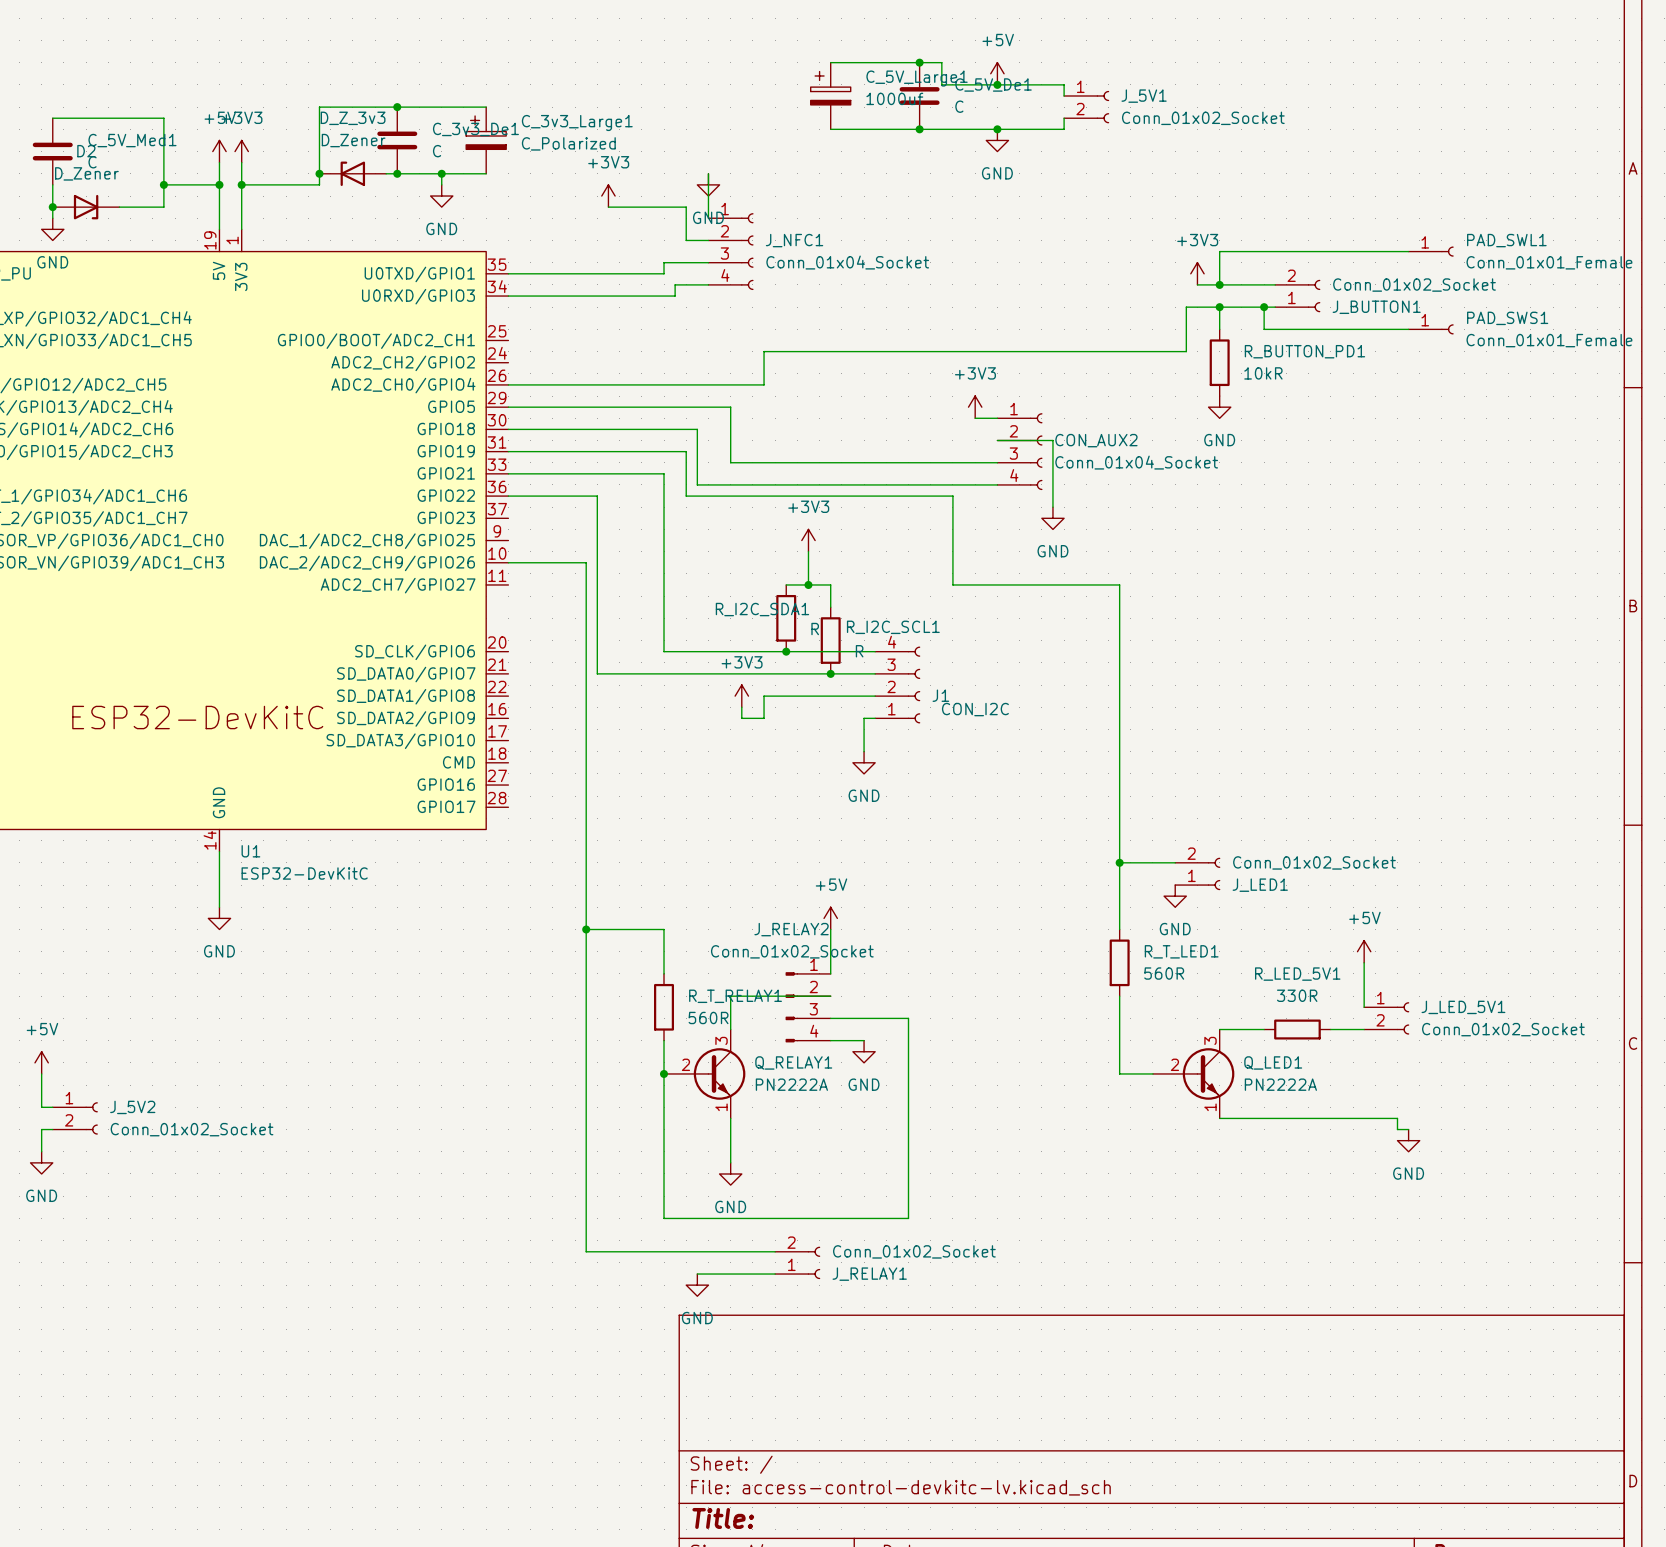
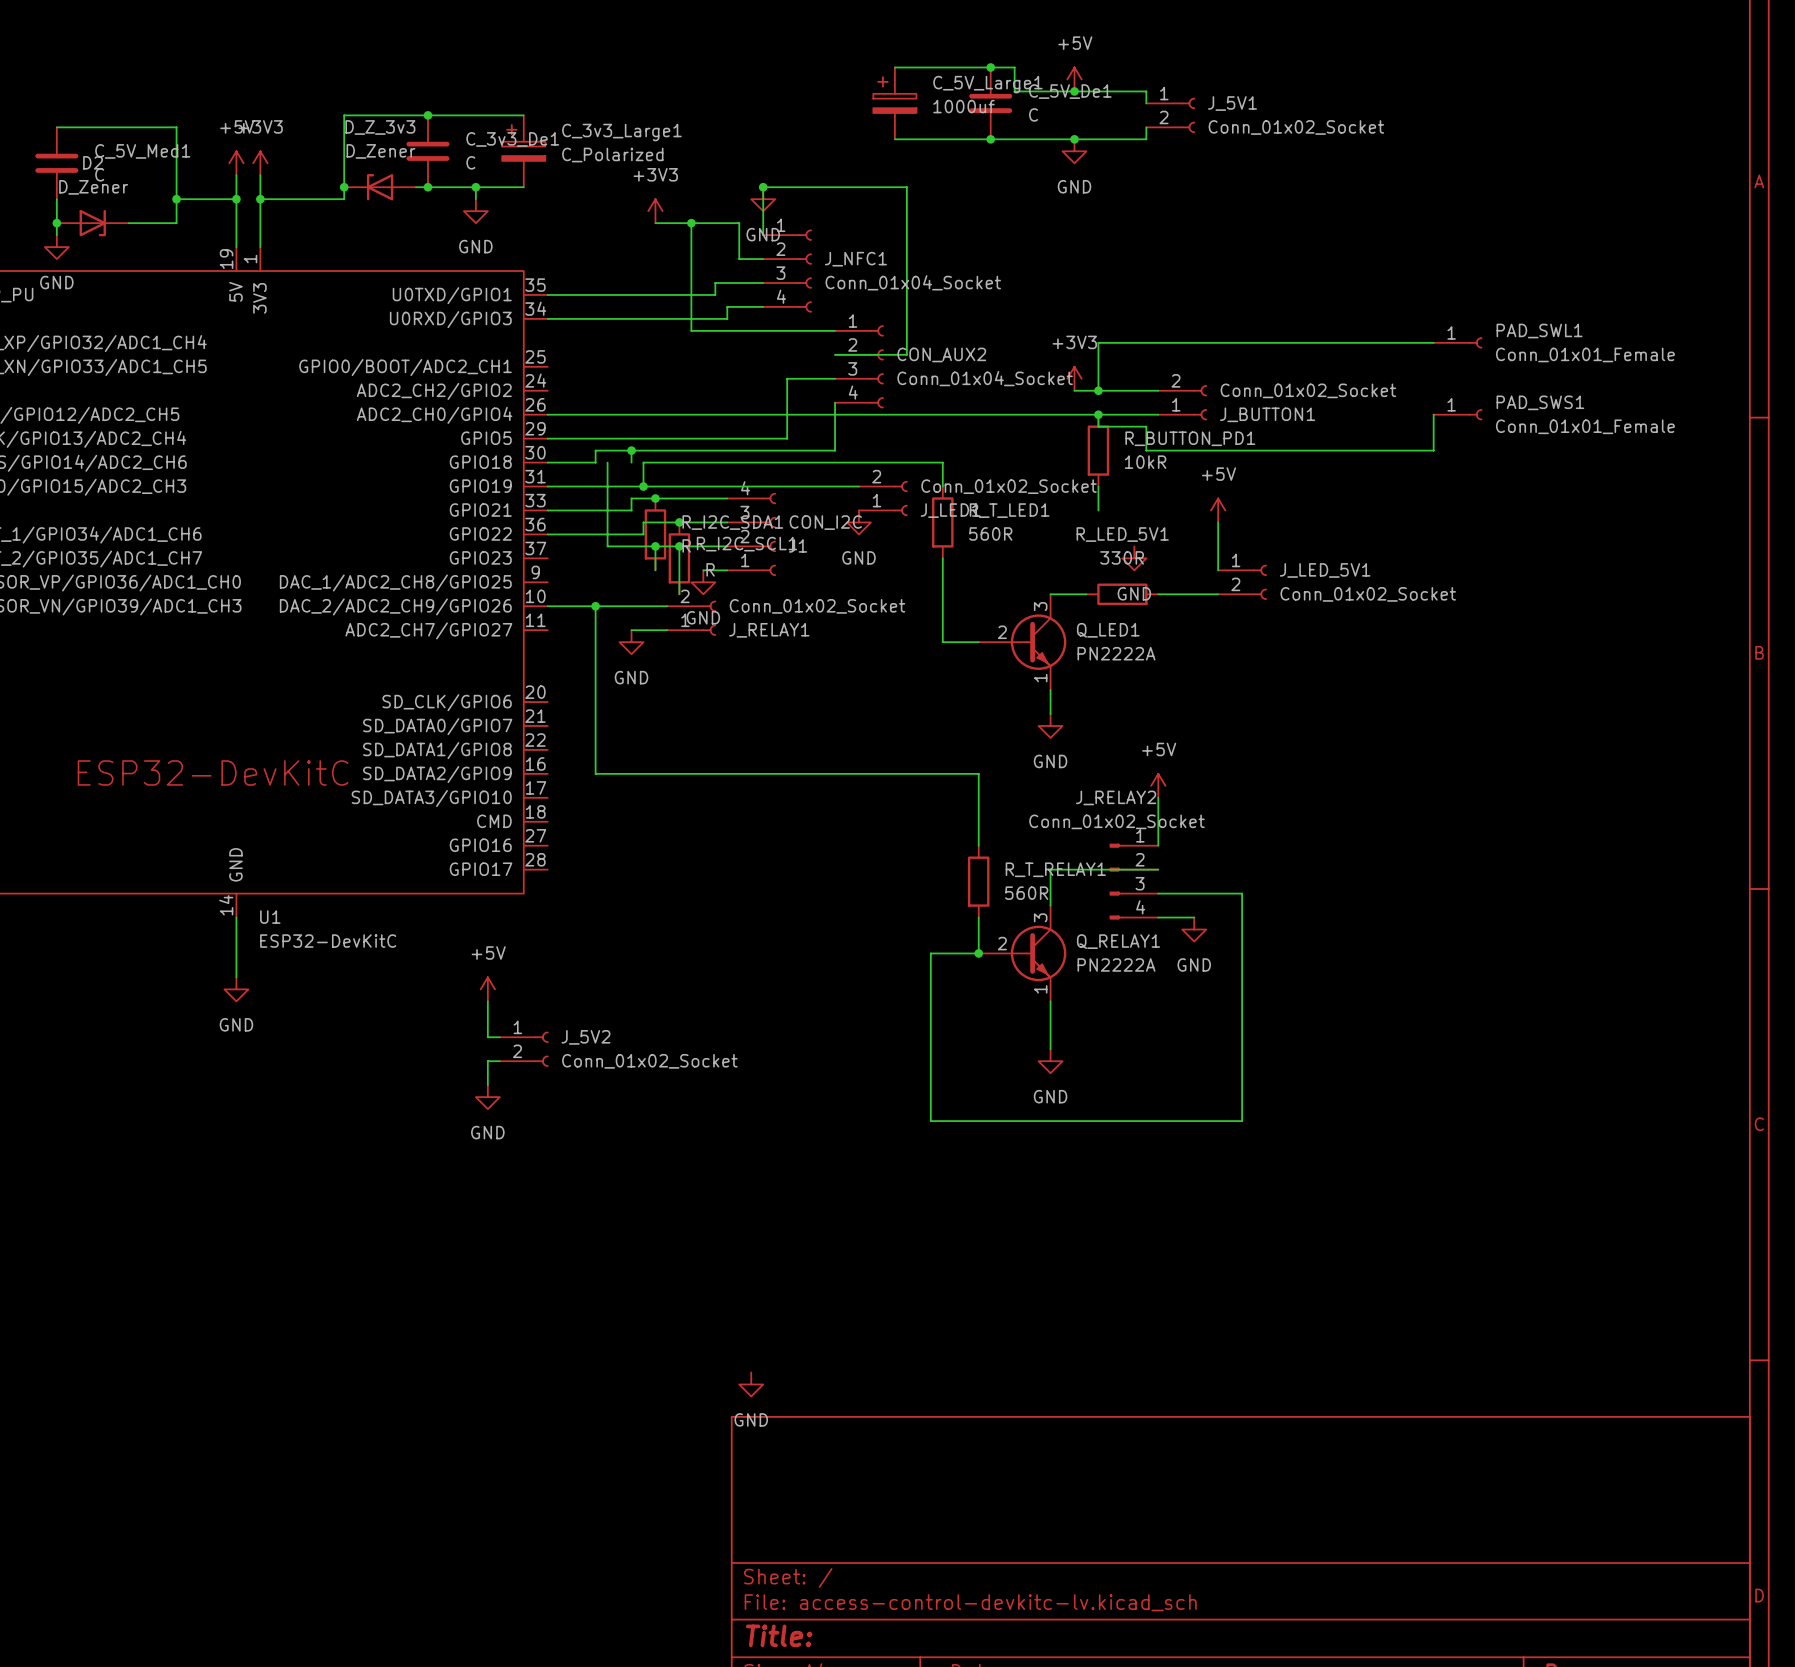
wire: none -> (763, 187) (906, 187) (906, 354) (835, 354)
junction: none -> (763, 187)
wire: none -> (691, 223) (691, 330) (835, 330)
junction: none -> (691, 223)
wire: (1408, 251) (1219, 251) (1219, 284) -> none
PAD_SWL1 position: (1431, 251) -> (1457, 342)
power symbol: +3V3 (1197, 273) -> none
wire: (1197, 284) (1275, 284) -> (1074, 390) (1158, 390)
junction: (1219, 284) -> none
J_BUTTON1 position: (1297, 296) -> (1182, 402)
wire: (1219, 307) (1219, 329) -> none
junction: (1219, 307) -> none
wire: (1264, 307) (1264, 329) (1408, 329) -> none
junction: (1264, 307) -> none
wire: (1275, 307) (1186, 307) (1186, 351) (775, 351) -> none
wire: none -> (1433, 342) (1098, 342) (1098, 390)
PAD_SWS1 position: (1431, 329) -> (1457, 414)
wire: (764, 351) (764, 384) -> (823, 378) (787, 378) (787, 438)
junction: none -> (1098, 390)
R_BUTTON_PD1 position: (1219, 362) -> (1098, 450)
wire: none -> (835, 402) (835, 450) (595, 450) (595, 462)
wire: none -> (823, 414) (1158, 414)
wire: none -> (1098, 414) (1098, 426) (1146, 426) (1146, 450) (1433, 450) (1433, 414)
junction: none -> (1098, 414)
wire: (730, 407) (730, 462) (997, 462) -> none
power symbol position: +3V3 (975, 407) -> +3V3 (1074, 378)
power symbol: GND (1219, 407) -> none
wire: none -> (631, 450) (631, 462)
junction: none -> (631, 450)
wire: (975, 418) (997, 418) -> none
wire: (552, 429) (597, 429) -> (643, 486) (643, 462)
wire: none -> (607, 462) (607, 546) (727, 546)
wire: (697, 429) (697, 484) (997, 484) -> (751, 462) (942, 462) (942, 486)
wire: (997, 440) (1052, 440) (1052, 507) -> none
junction: none -> (643, 486)
wire: (686, 451) (686, 496) (952, 496) (952, 584) (1119, 584) (1119, 929) -> (739, 486) (858, 486)
wire: none -> (1098, 486) (1098, 510)
CON_AUX2 position: (1019, 451) -> (859, 366)
junction: none -> (655, 498)
wire: (586, 473) (664, 473) (664, 651) (875, 651) -> (631, 510) (631, 498) (727, 498)
power symbol: none -> +5V (1218, 510)
junction: none -> (679, 522)
power symbol: none -> GND (858, 522)
wire: none -> (1218, 522) (1218, 570)
wire: (597, 496) (597, 673) (875, 673) -> (643, 534) (643, 522) (727, 522)
wire: none -> (655, 546) (655, 570)
junction: none -> (655, 546)
wire: none -> (679, 546) (679, 594)
junction: none -> (679, 546)
wire: none -> (942, 558) (942, 642) (978, 642)
wire: none -> (703, 570) (727, 570)
power symbol: none -> GND (703, 582)
power symbol: +3V3 (808, 540) -> none
wire: (808, 551) (808, 584) -> none
wire: none -> (1050, 594) (1086, 594)
wire: none -> (1158, 594) (1218, 594)
junction: none -> (595, 606)
wire: (586, 562) (586, 1251) (775, 1251) -> (631, 606) (667, 606)
wire: none -> (631, 630) (667, 630)
wire: (786, 584) (830, 584) (830, 607) -> none
junction: (808, 584) -> none
power symbol: none -> GND (631, 642)
R_I2C_SDA1 name position: R_I2C_SDA1 (762, 609) -> R_I2C_SDA1 (732, 522)
R_I2C_SDA1 position: (786, 618) -> (655, 534)
R_I2C_SCL1 position: (830, 640) -> (679, 558)
wire: none -> (1050, 690) (1050, 714)
junction: (786, 651) -> none
junction: (830, 673) -> none
power symbol: none -> GND (1050, 725)
J1 position: (897, 685) -> (751, 534)
power symbol: +3V3 (741, 696) -> none
wire: (875, 696) (764, 696) (764, 718) -> (930, 773) (823, 773)
wire: (741, 707) (741, 718) -> (595, 606) (595, 773) (799, 773)
J1 value position: CON_I2C (975, 709) -> CON_I2C (825, 522)
wire: (864, 718) (864, 751) -> none
wire: none -> (942, 773) (978, 773) (978, 845)
power symbol: none -> +5V (1158, 785)
wire: none -> (1158, 797) (1158, 845)
power symbol: GND (864, 762) -> none
wire: none -> (1158, 869) (1050, 869) (1050, 905)
wire: none -> (1158, 893) (1242, 893) (1242, 1121) (930, 1121) (930, 953) (978, 953) (978, 917)
wire: none -> (1158, 917) (1194, 917)
wire: (1119, 862) (1175, 862) -> none
junction: (1119, 862) -> none
J_LED1 position: (1197, 873) -> (883, 498)
junction: none -> (978, 953)
power symbol position: GND (1175, 896) -> GND (1194, 929)
power symbol: none -> +5V (487, 989)
power symbol: +5V (830, 918) -> none
wire: none -> (487, 1001) (487, 1037) (499, 1037)
wire: (586, 929) (664, 929) (664, 973) -> none
junction: (586, 929) -> none
wire: (830, 929) (830, 973) -> (1050, 1001) (1050, 1049)
power symbol: +5V (1364, 951) -> none
R_T_LED1 position: (1119, 962) -> (942, 522)
wire: (1364, 962) (1364, 1007) -> none
wire: none -> (499, 1061) (487, 1061) (487, 1085)
power symbol: none -> GND (1050, 1061)
wire: (830, 996) (730, 996) (730, 1029) -> none
wire: (1119, 996) (1119, 1073) (1152, 1073) -> none
R_T_RELAY1 position: (664, 1007) -> (978, 881)
J_RELAY2 position: (808, 1007) -> (1134, 881)
power symbol: none -> GND (487, 1097)
wire: (830, 1018) (908, 1018) (908, 1218) (664, 1218) (664, 1040) -> none
J_LED_5V1 position: (1386, 1018) -> (1242, 582)
wire: (1219, 1029) (1264, 1029) -> none
R_LED_5V1 position: (1297, 1029) -> (1122, 594)
wire: (1330, 1029) (1364, 1029) -> none
wire: (830, 1040) (864, 1040) -> none
power symbol: GND (864, 1051) -> none
power symbol: +5V (41, 1062) -> none
wire: (41, 1073) (41, 1107) (52, 1107) -> none
junction: (664, 1073) -> none
Q_RELAY1 position: (704, 1073) -> (1022, 953)
Q_LED1 position: (1193, 1073) -> (1022, 642)
J_5V2 position: (75, 1118) -> (524, 1049)
wire: (730, 1118) (730, 1162) -> none
wire: (1219, 1118) (1397, 1118) (1397, 1129) (1408, 1129) -> none
wire: (52, 1129) (41, 1129) (41, 1151) -> none
power symbol: GND (1408, 1140) -> none
power symbol: GND (41, 1162) -> none
power symbol: GND (730, 1173) -> none
J_RELAY1 position: (797, 1262) -> (691, 618)
wire: (697, 1274) (775, 1274) -> none

